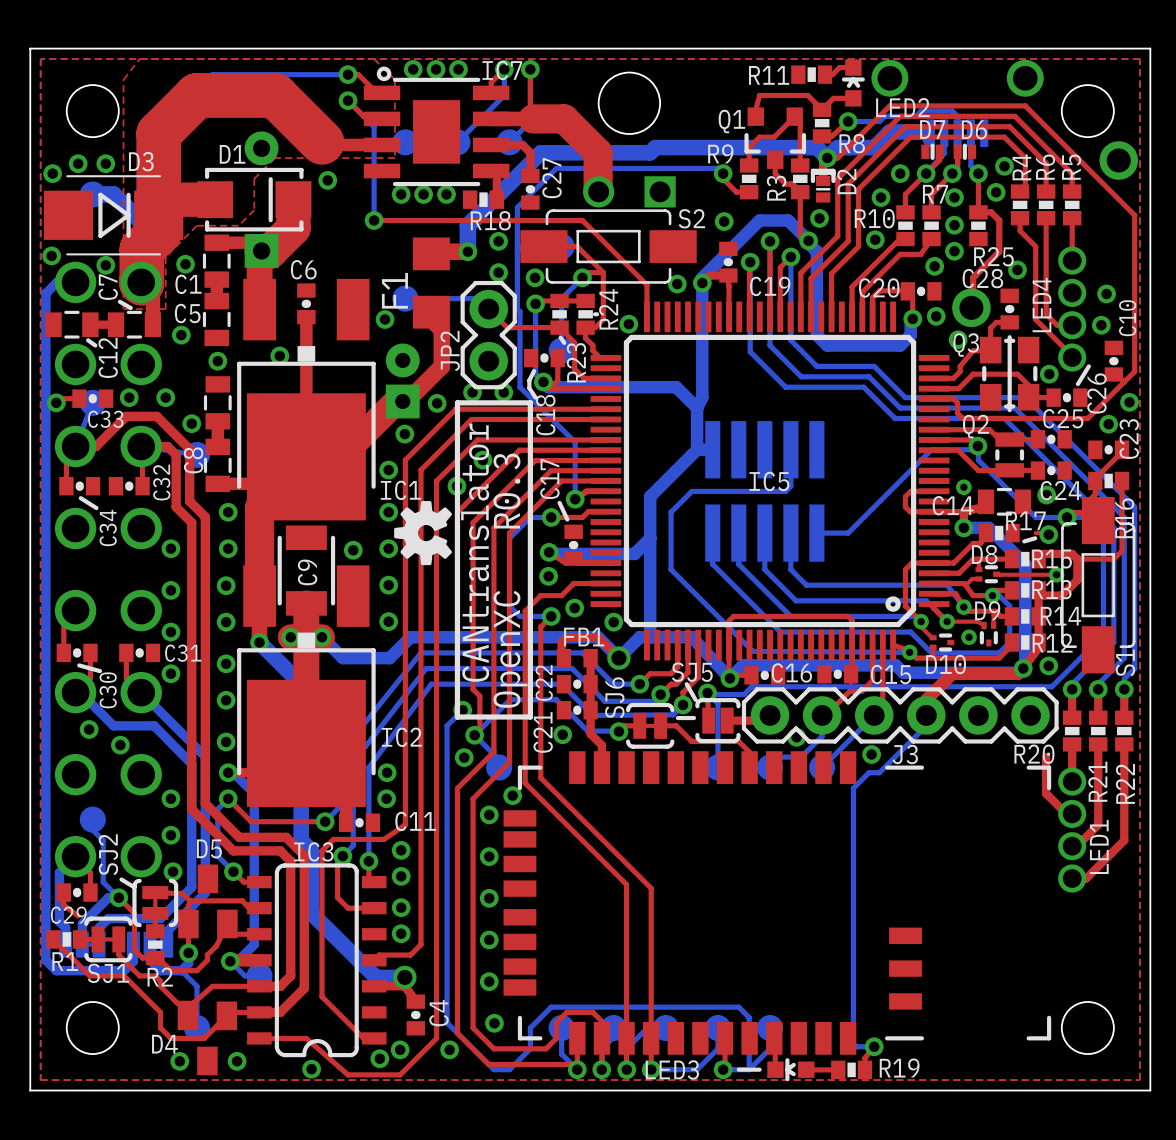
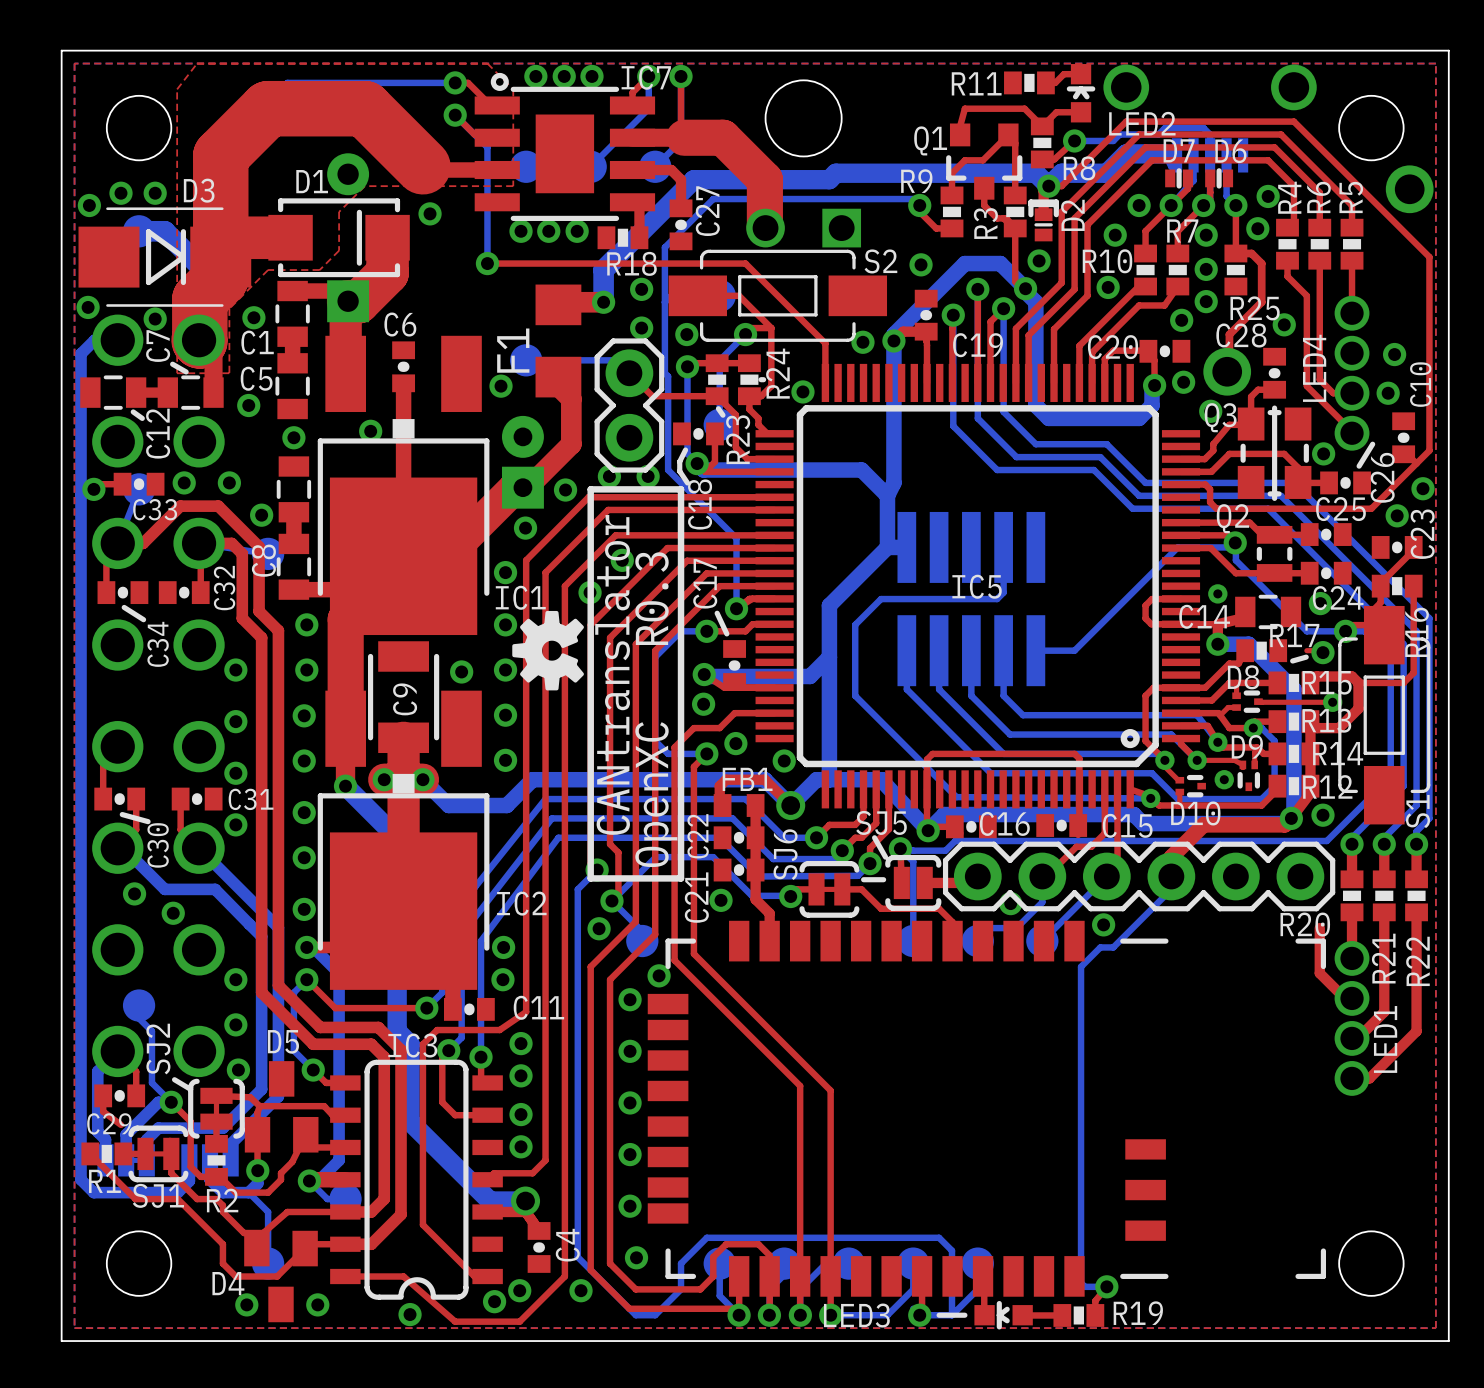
JP2 name: JP2 (450, 351) -> none
J3 name: J3 (905, 754) -> none

